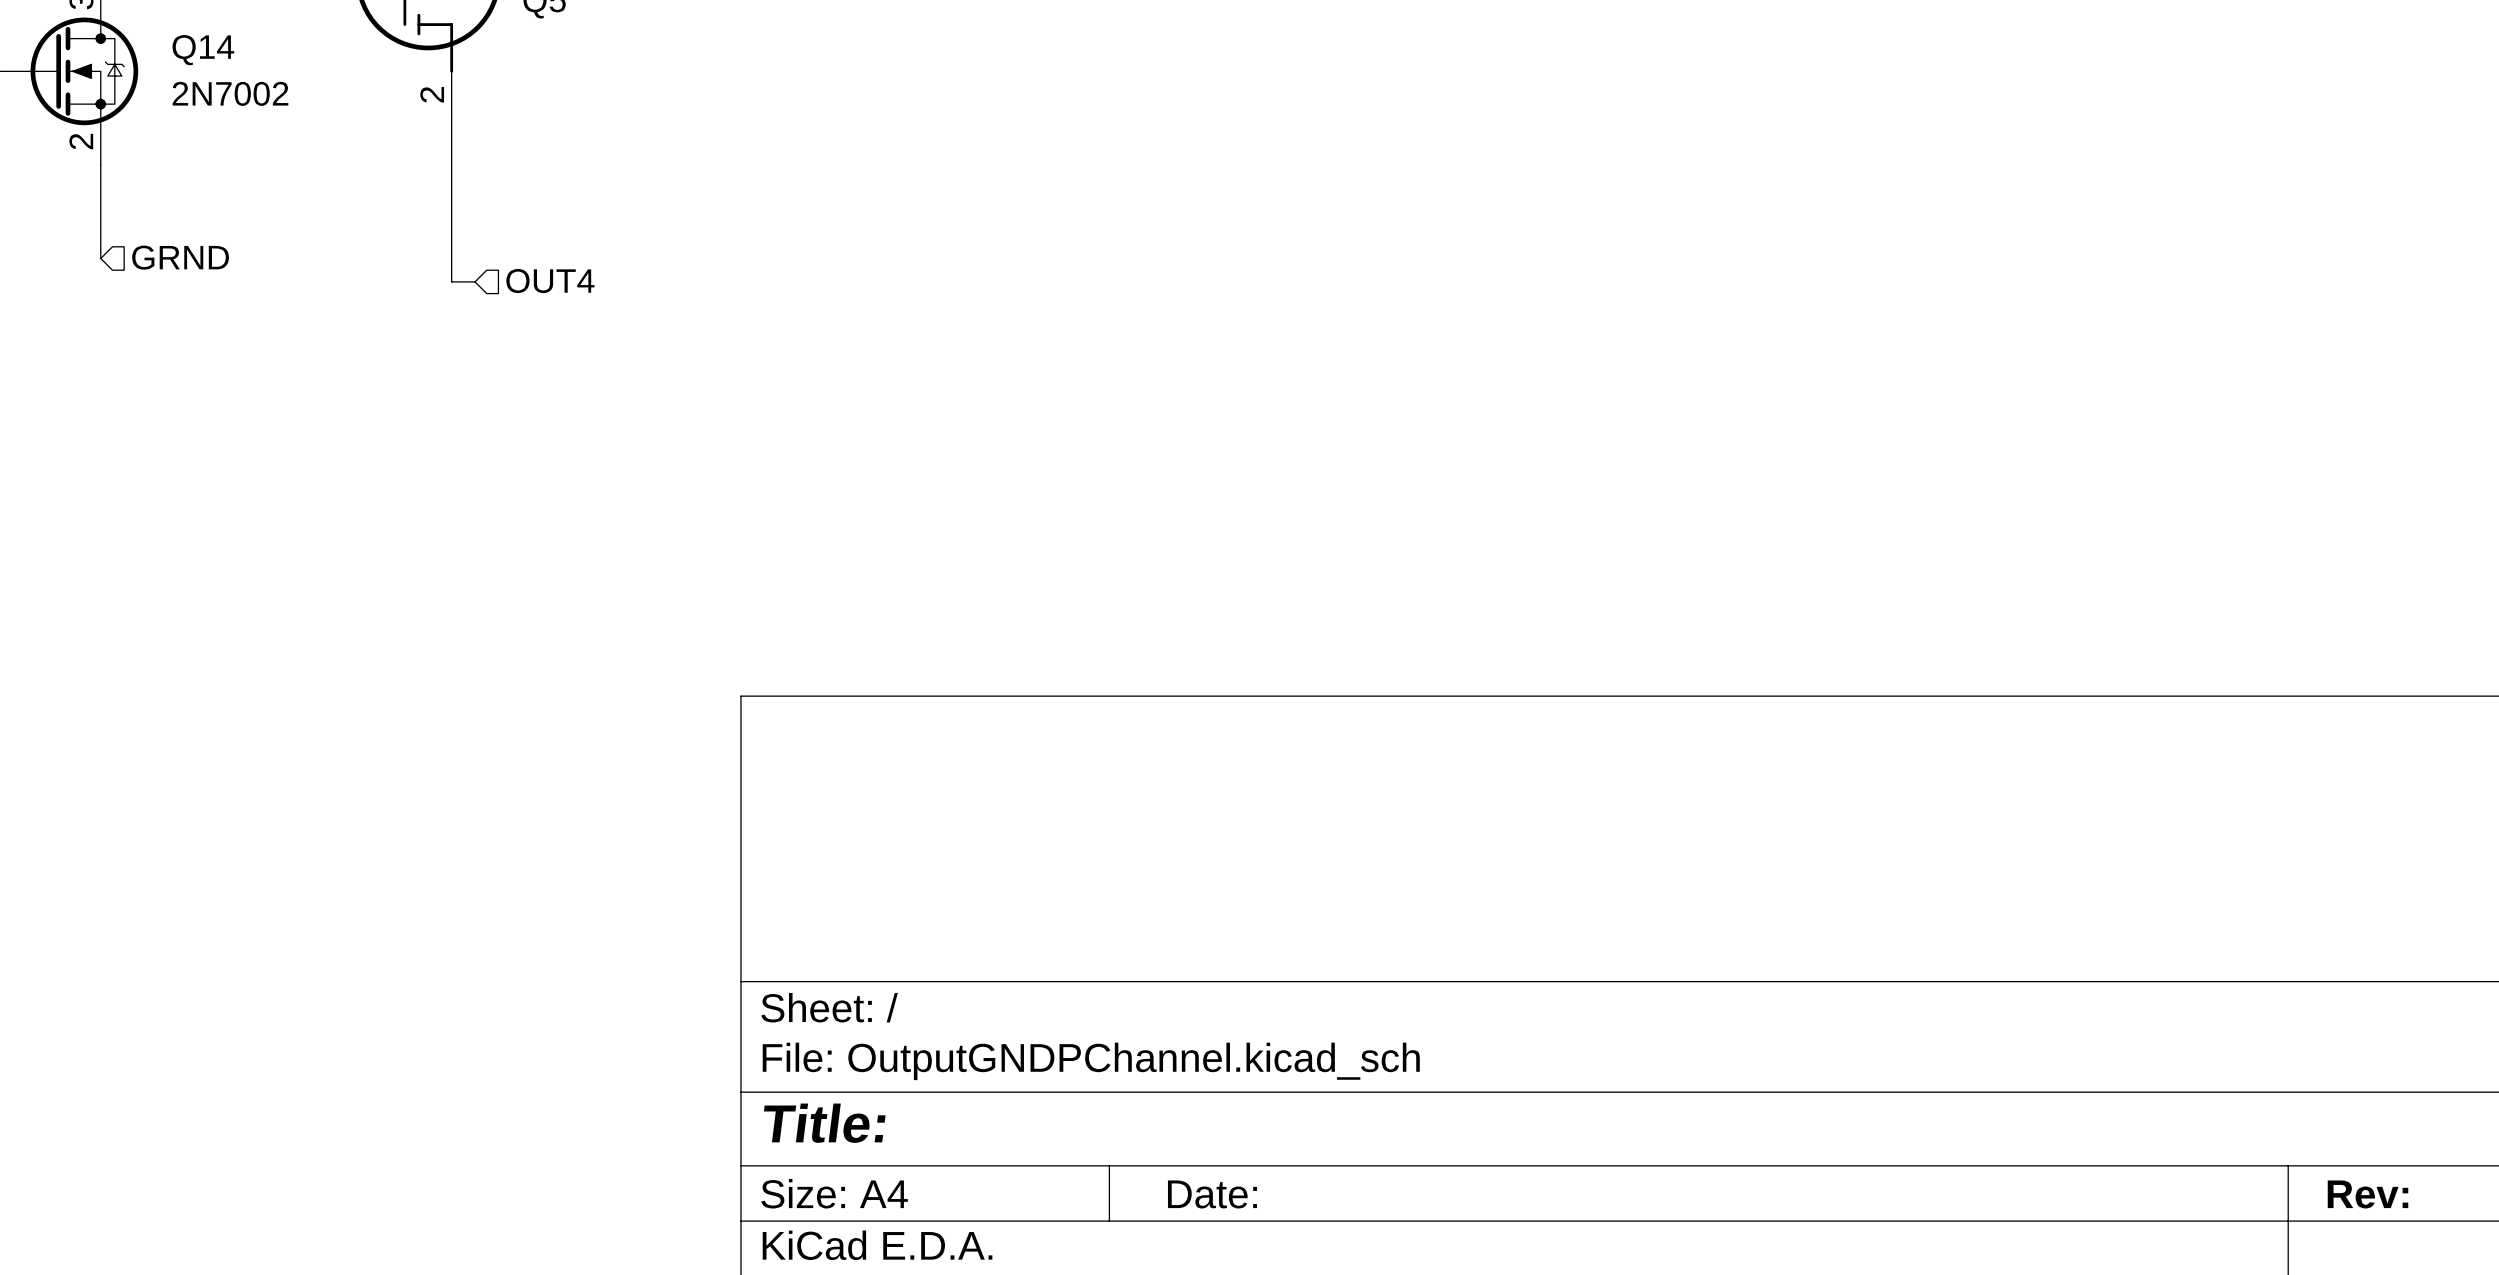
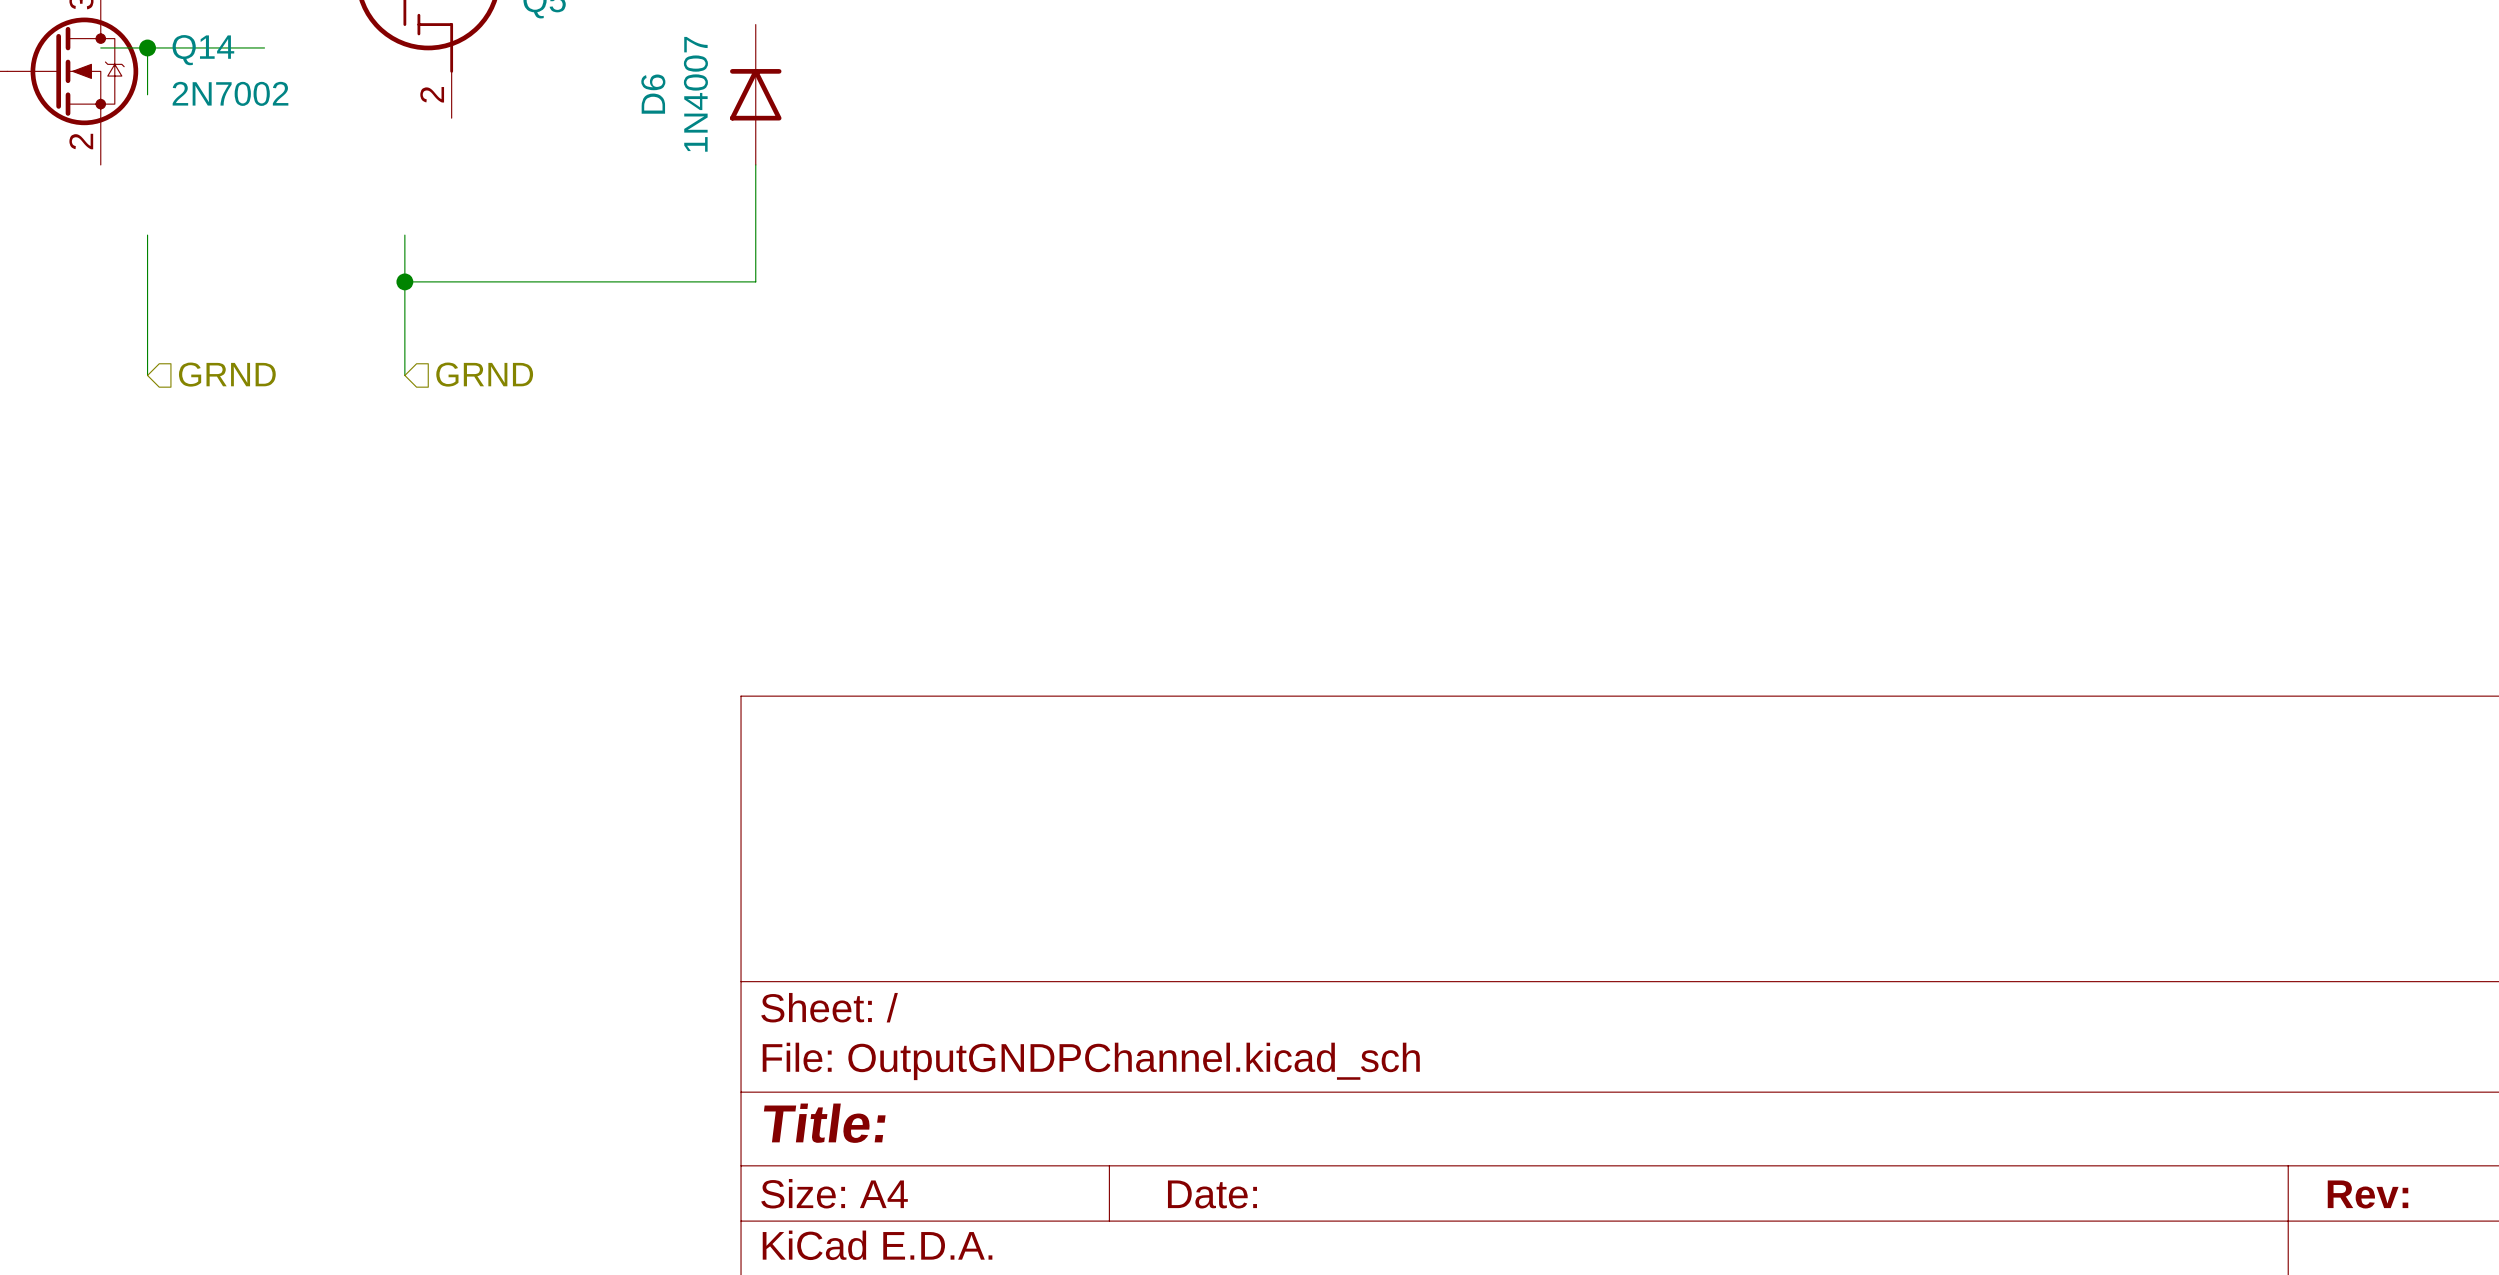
wire: none -> (100, 47) (264, 47)
wire: none -> (147, 47) (147, 94)
junction: none -> (147, 47)
D6: none -> 1N4007 (755, 94)
wire: (451, 118) (451, 281) -> (404, 281) (451, 281)
wire: (100, 164) (100, 258) -> none
wire: none -> (755, 164) (755, 281) (475, 281)
wire: none -> (147, 235) (147, 375)
wire: none -> (404, 235) (404, 375)
hierarchical label position: GRND (180, 257) -> GRND (227, 374)
junction: none -> (404, 281)
hierarchical label: OUT4 (550, 281) -> none
hierarchical label: none -> GRND (484, 374)

